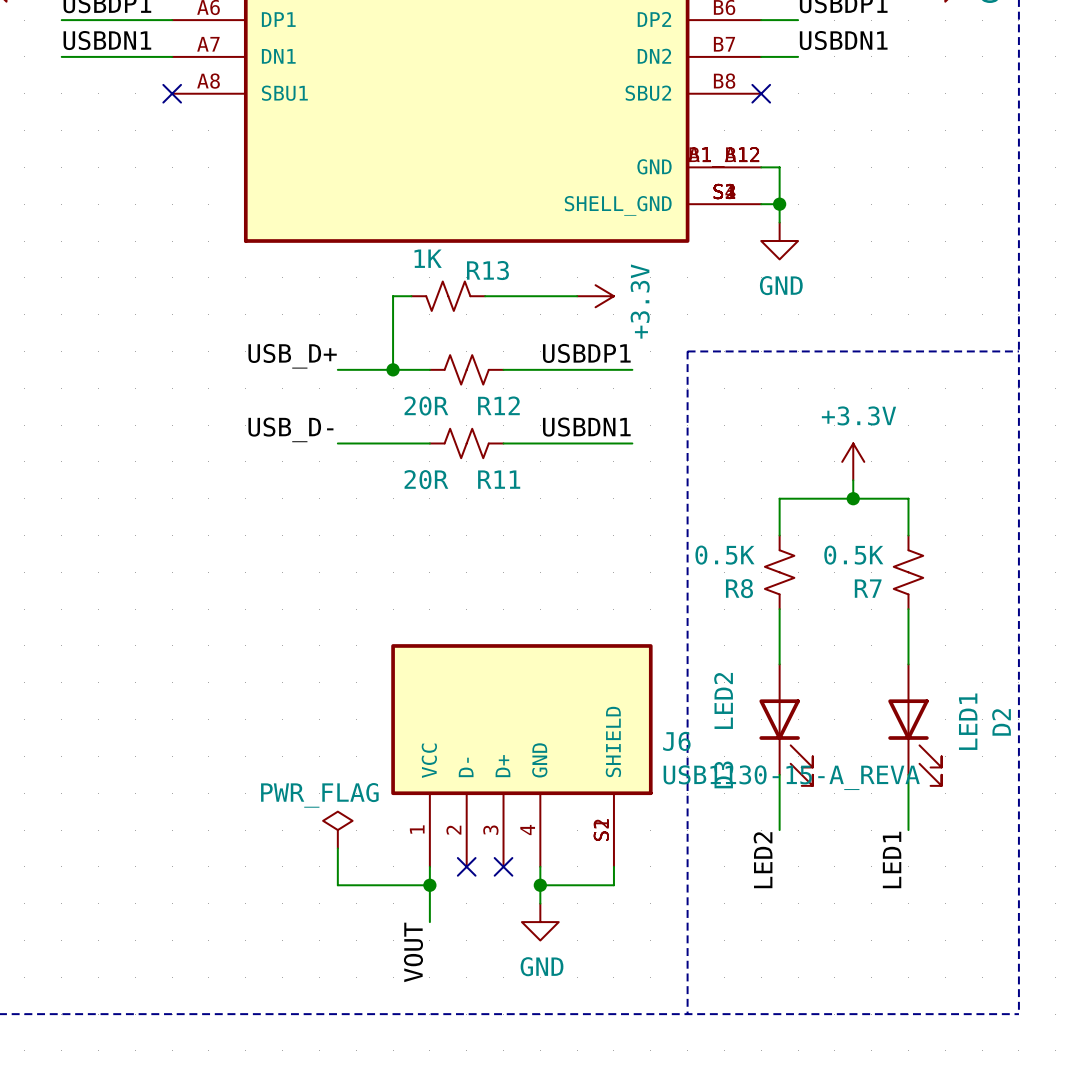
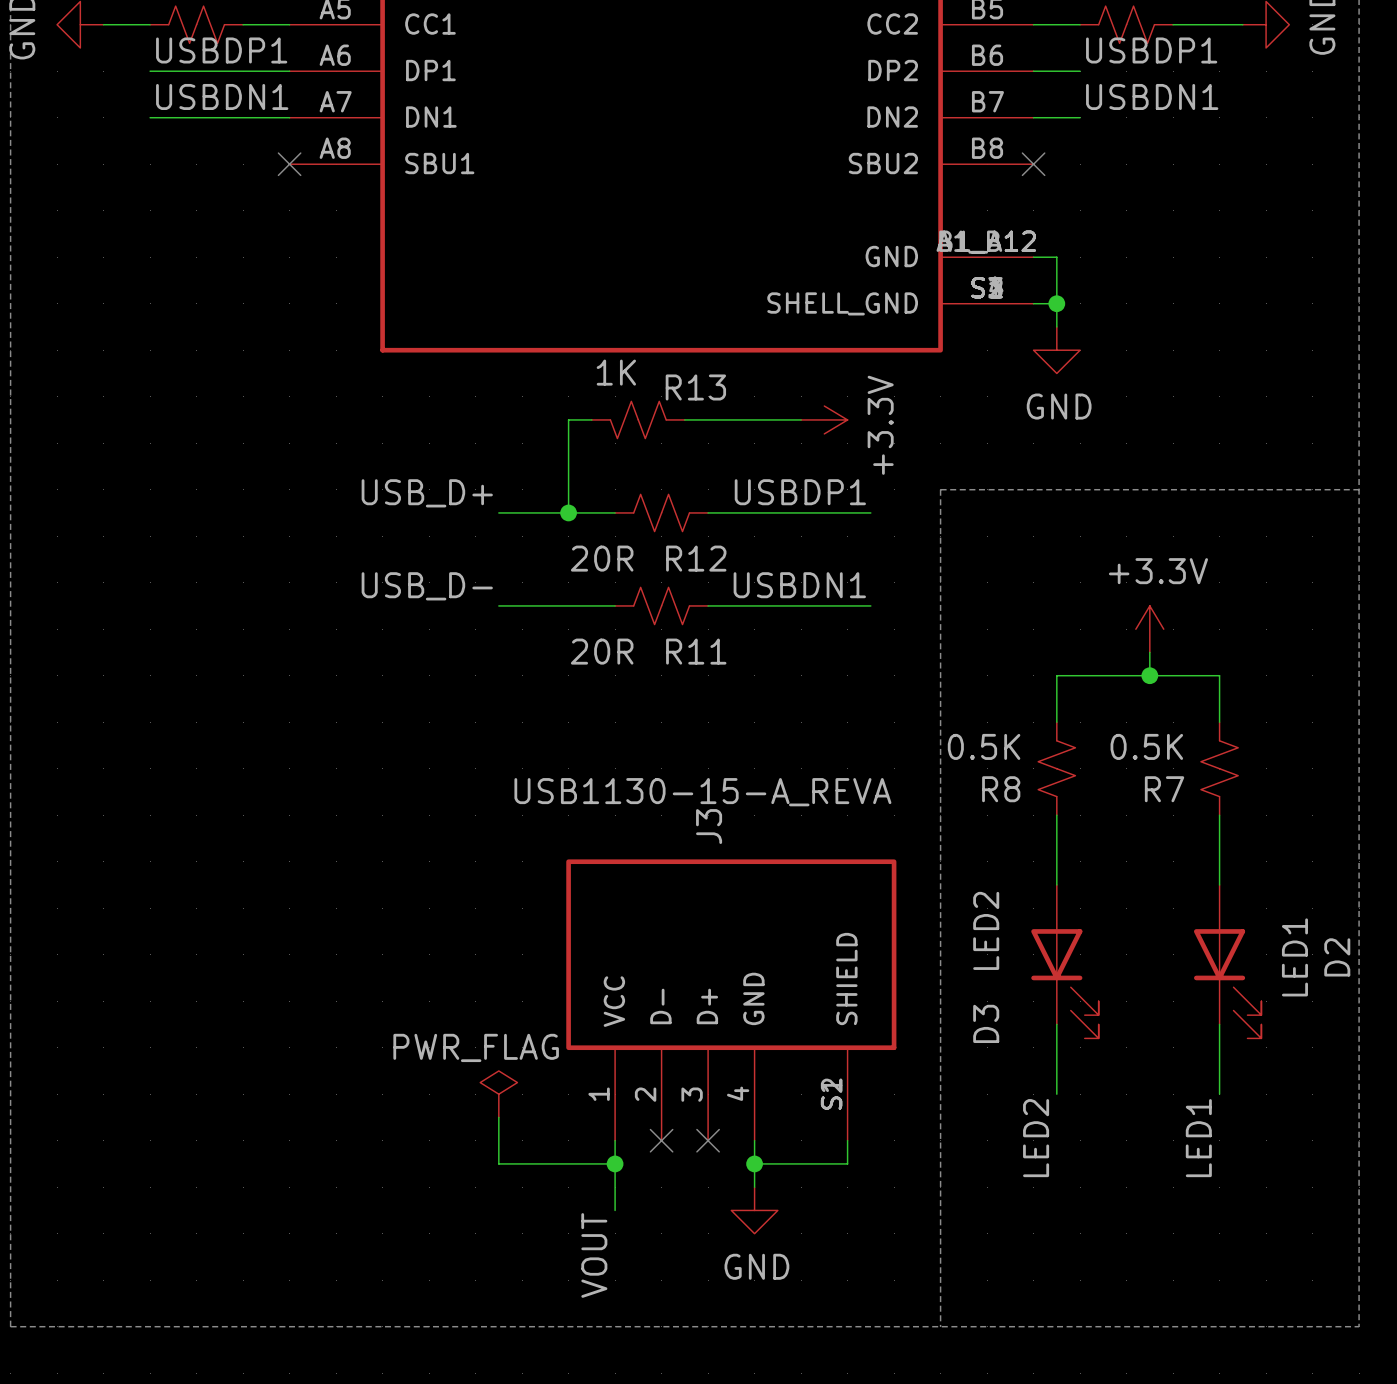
J6 name: J6 (676, 741) -> J3 (709, 826)
J6 value position: USB1130-15-A_REVA (791, 777) -> USB1130-15-A_REVA (702, 792)

